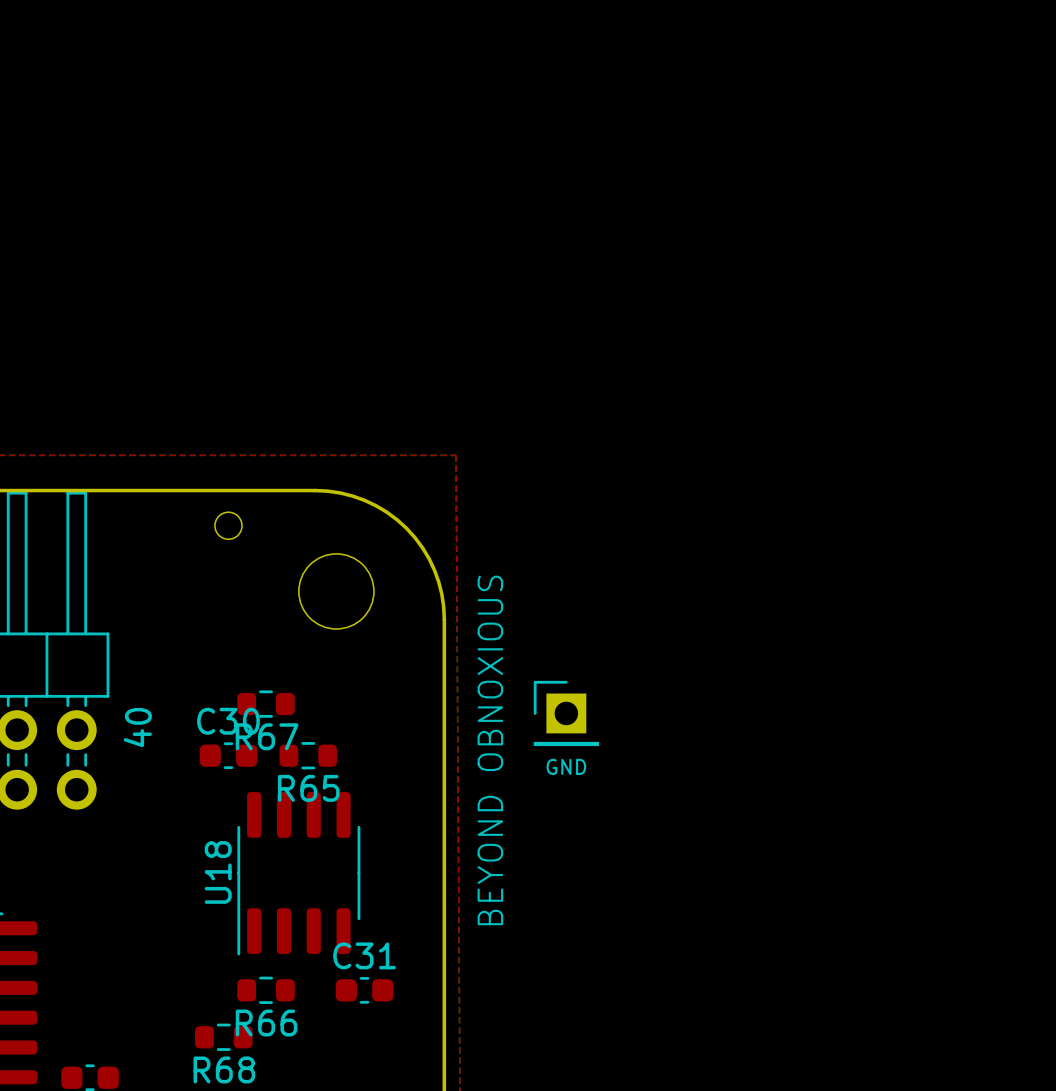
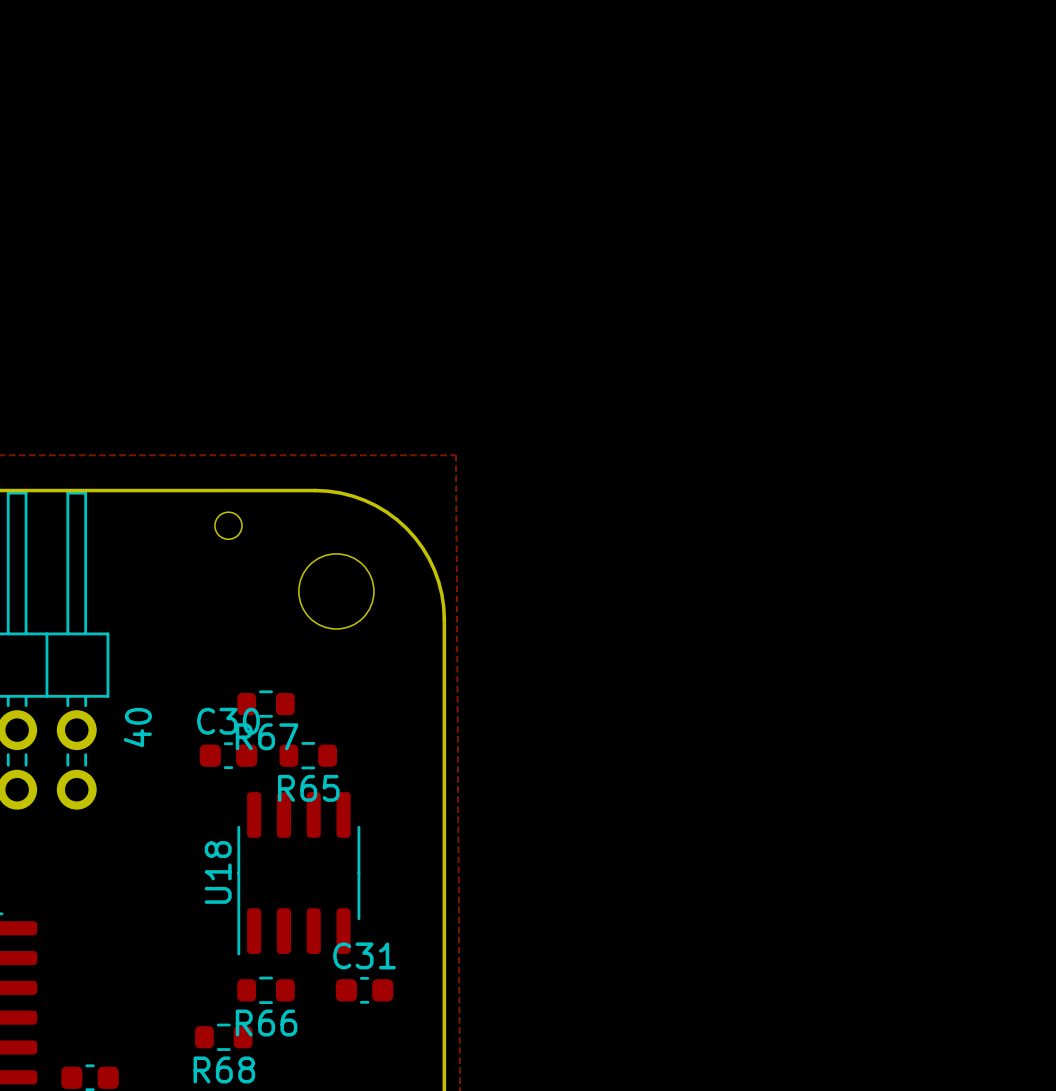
part: (566, 713) -> none
text: BEYOND OBNOXIOUS (490, 750) -> none
text: GND (566, 766) -> none

